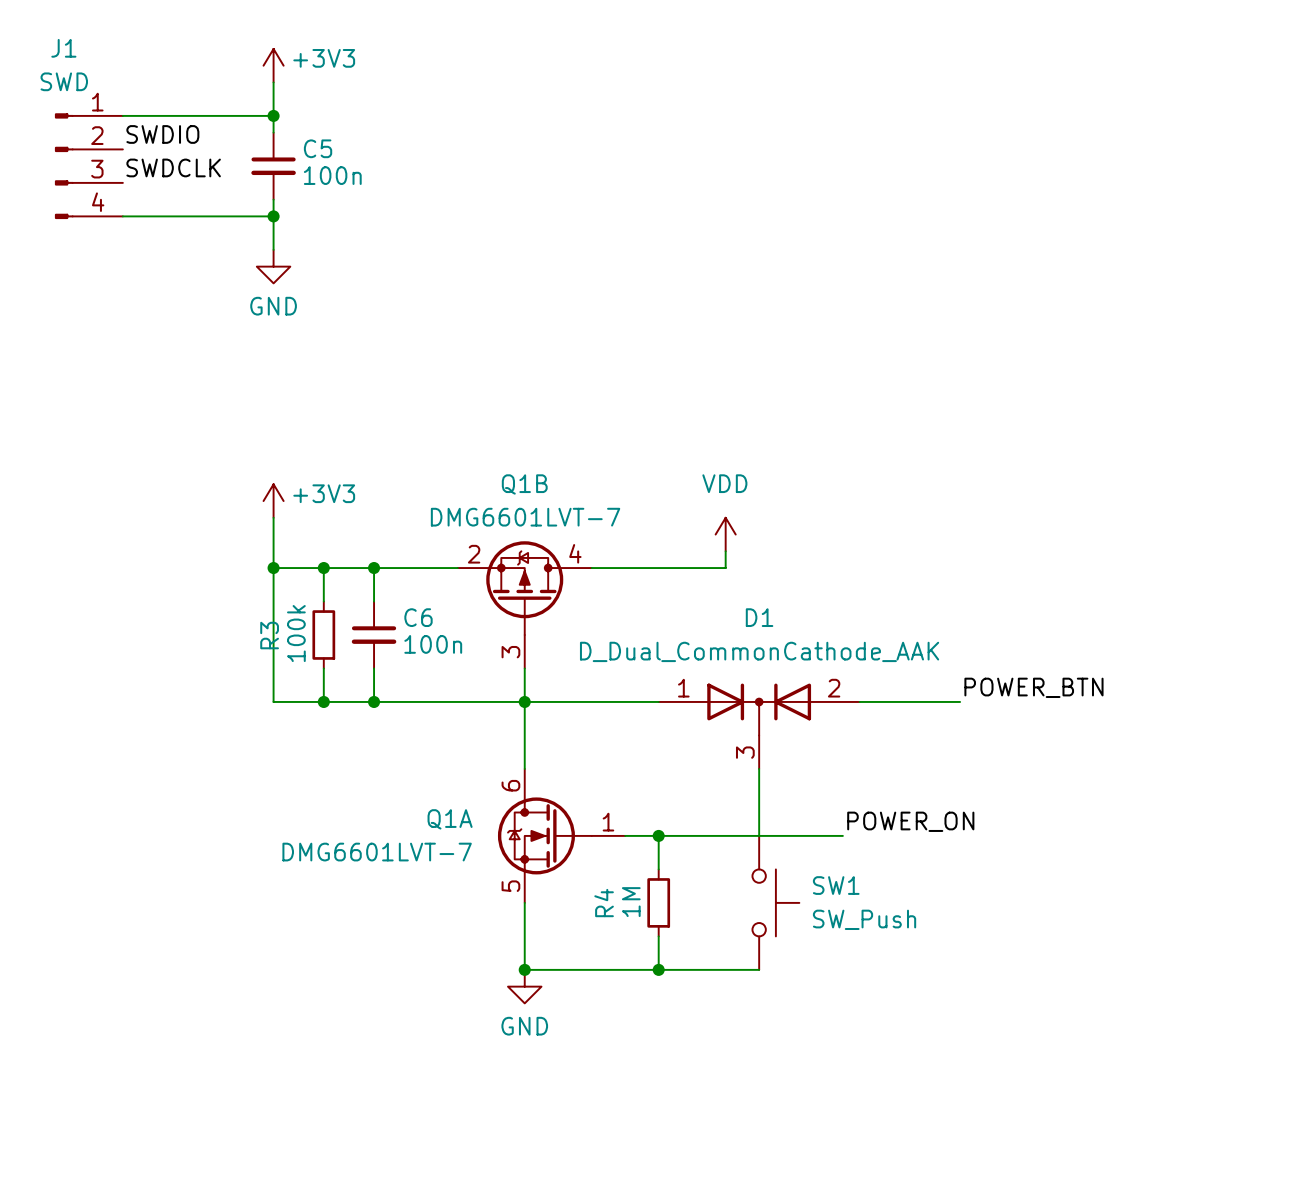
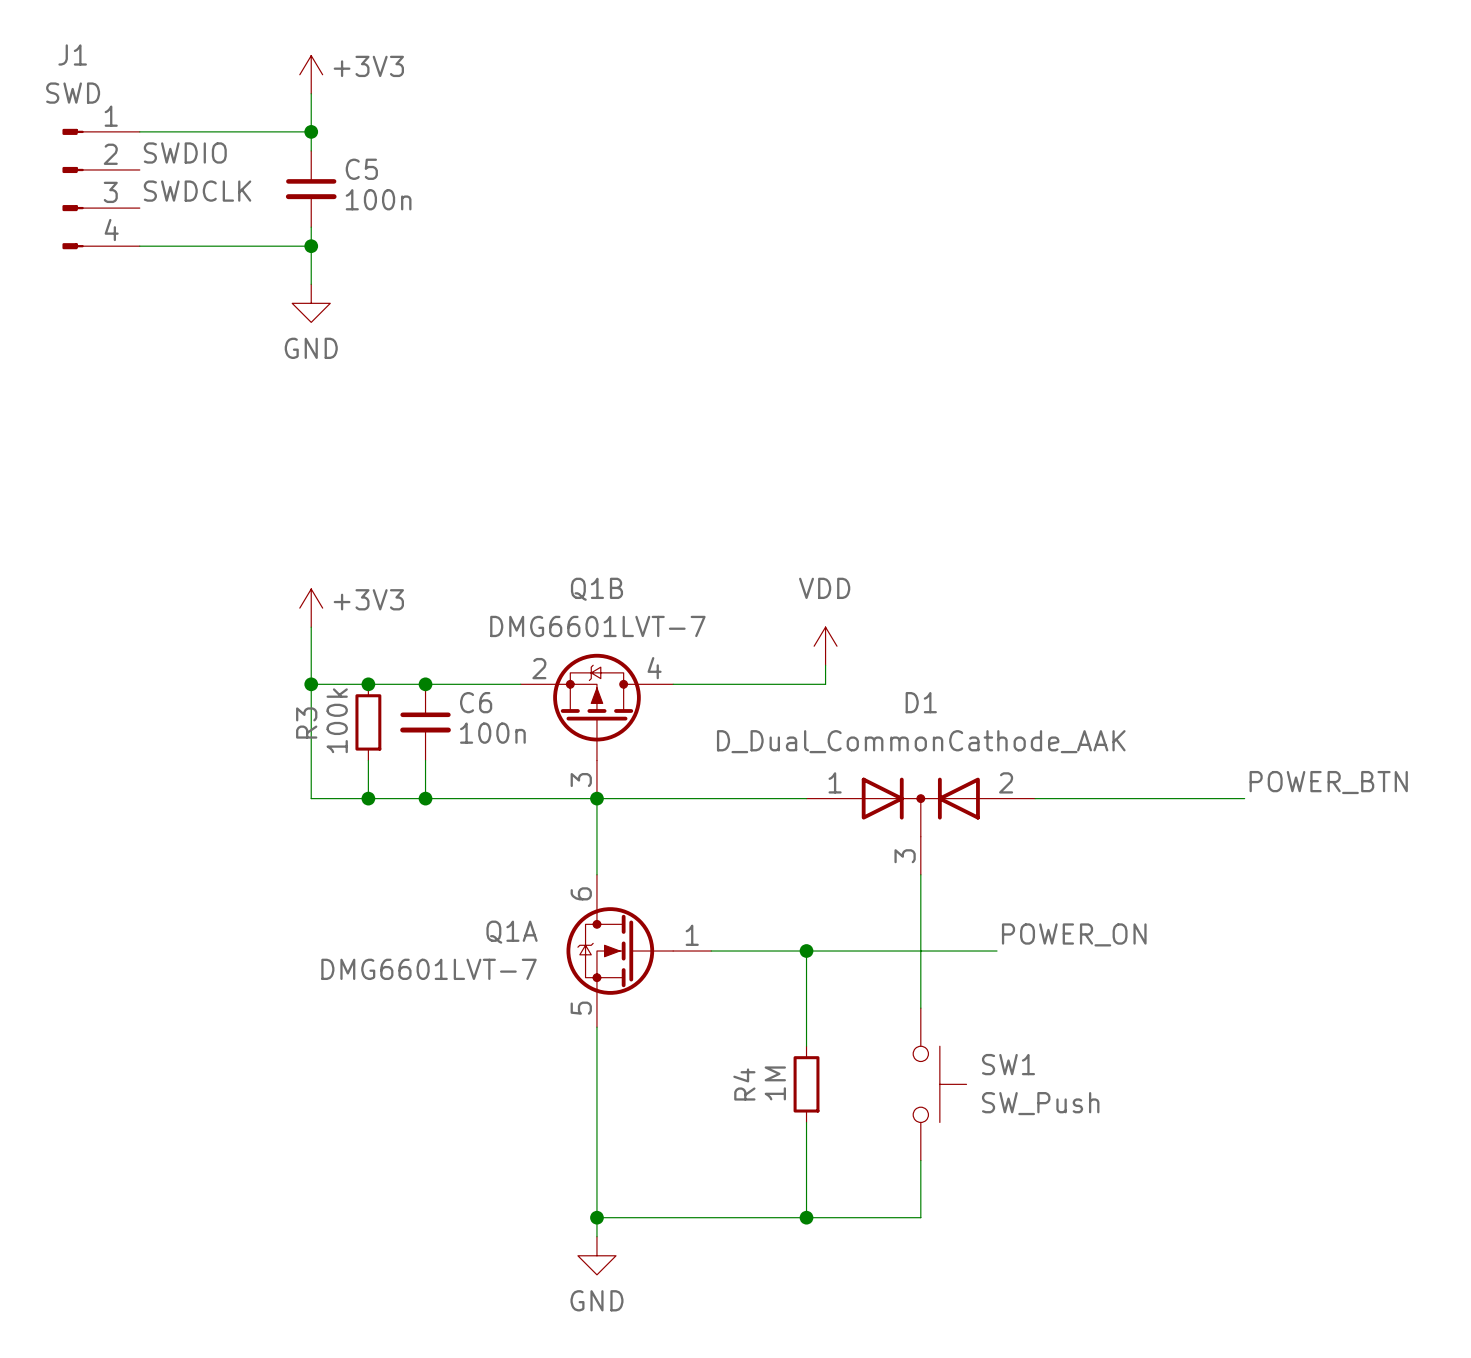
power symbol position: +3V3 (273, 501) -> +3V3 (311, 608)
power symbol position: VDD (725, 534) -> VDD (825, 646)
wire: (725, 551) (725, 568) (591, 568) -> (825, 665) (825, 684) (673, 684)
wire: (273, 568) (457, 568) -> (311, 684) (520, 684)
junction: (273, 568) -> none
wire: (323, 568) (323, 601) -> none
junction: (323, 568) -> none
wire: (374, 568) (374, 601) -> none
junction: (374, 568) -> none
junction: none -> (311, 684)
junction: none -> (368, 684)
junction: none -> (425, 684)
Q1B position: (524, 604) -> (596, 726)
label position: POWER_BTN (1033, 687) -> POWER_BTN (1328, 782)
wire: none -> (1092, 798) (1244, 798)
D1 position: (759, 726) -> (920, 826)
wire: (759, 768) (759, 835) -> none
wire: none -> (920, 874) (920, 1008)
label position: POWER_ON (910, 821) -> POWER_ON (1074, 934)
wire: (658, 835) (658, 869) -> none
junction position: (658, 835) -> (806, 951)
wire: none -> (806, 951) (806, 1046)
wire: none -> (958, 951) (997, 951)
R4 position: (658, 902) -> (806, 1084)
SW1 position: (775, 902) -> (939, 1084)
wire: (658, 936) (658, 969) -> none
wire: (524, 969) (759, 969) -> (596, 1103) (596, 1236)
junction: (524, 969) -> none
junction: (658, 969) -> none
power symbol position: GND (524, 986) -> GND (596, 1255)
wire: none -> (806, 1122) (806, 1217)
wire: none -> (920, 1160) (920, 1217) (596, 1217)
junction: none -> (596, 1217)
junction: none -> (806, 1217)

